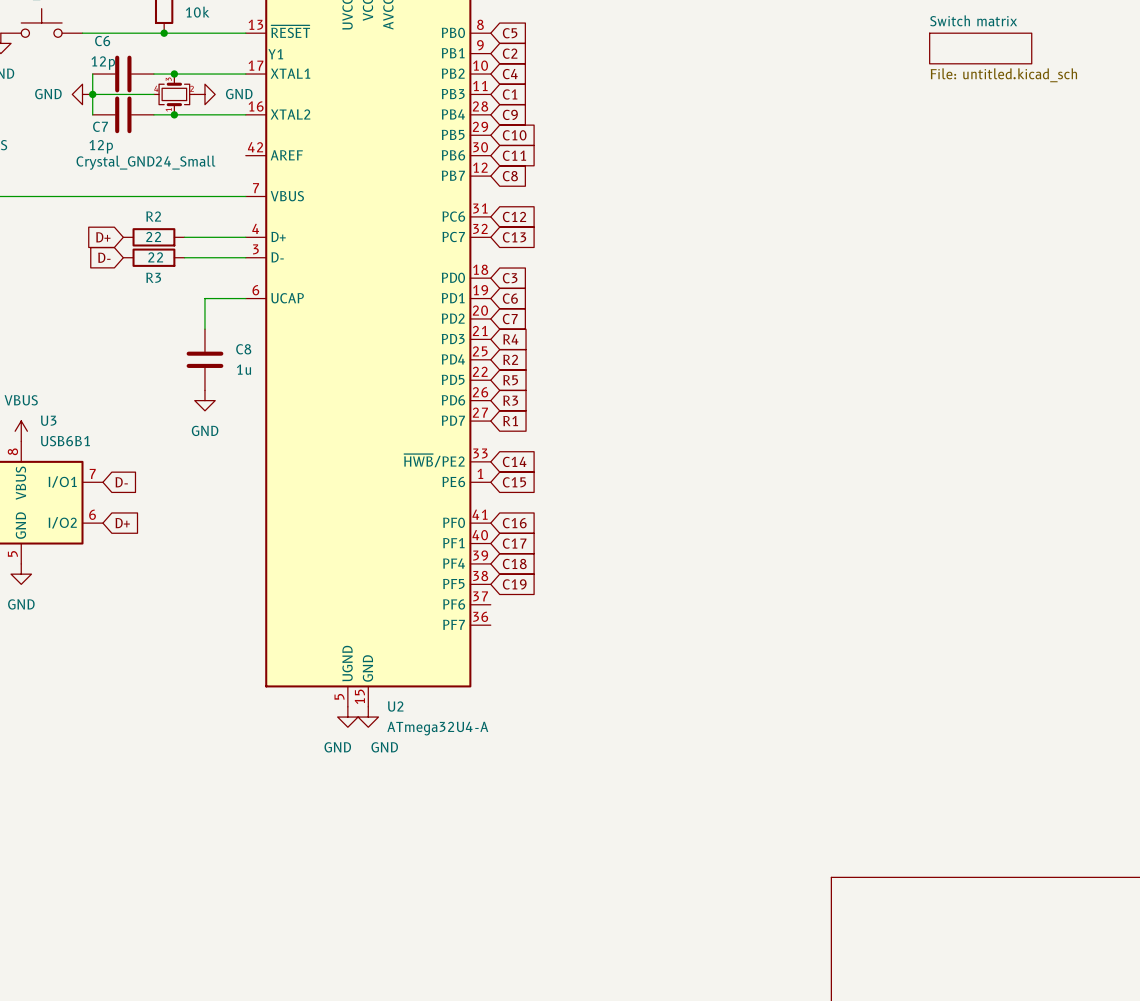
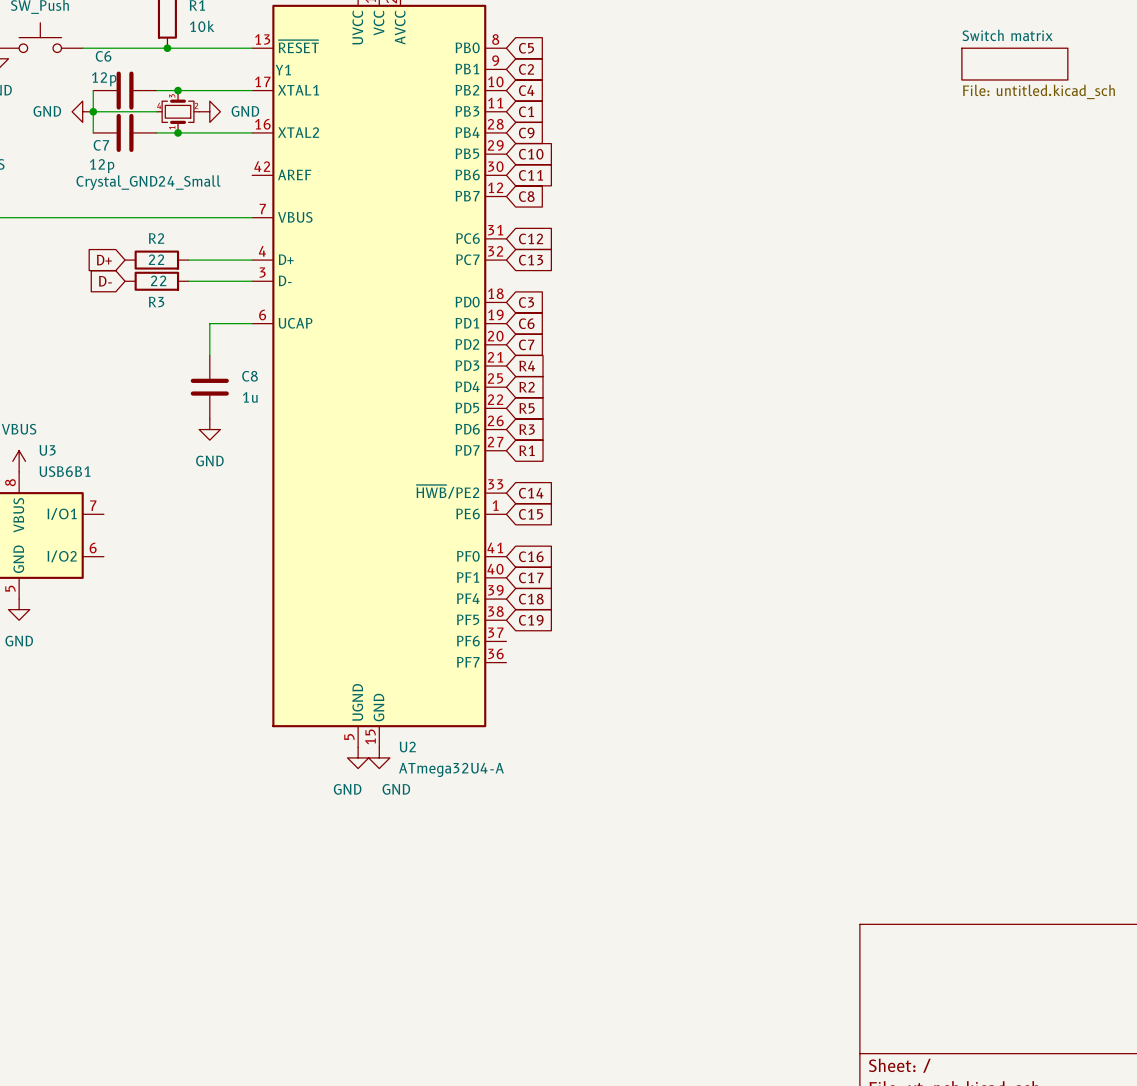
global label: D- (121, 482) -> none
global label: D+ (122, 523) -> none

